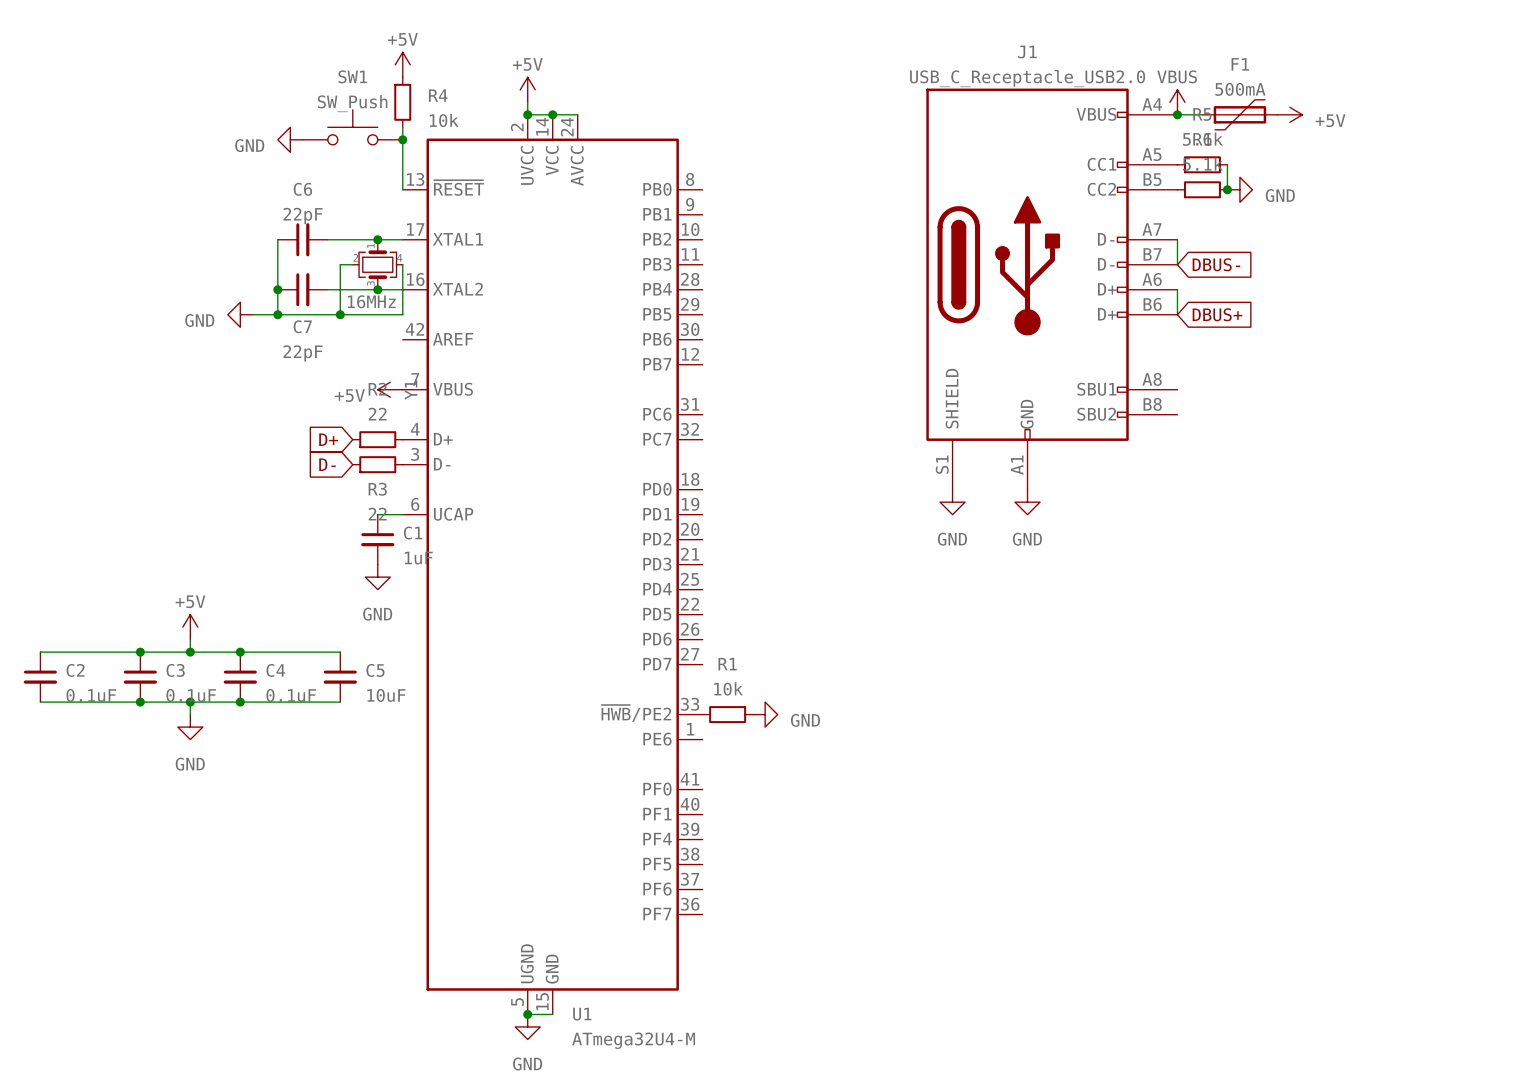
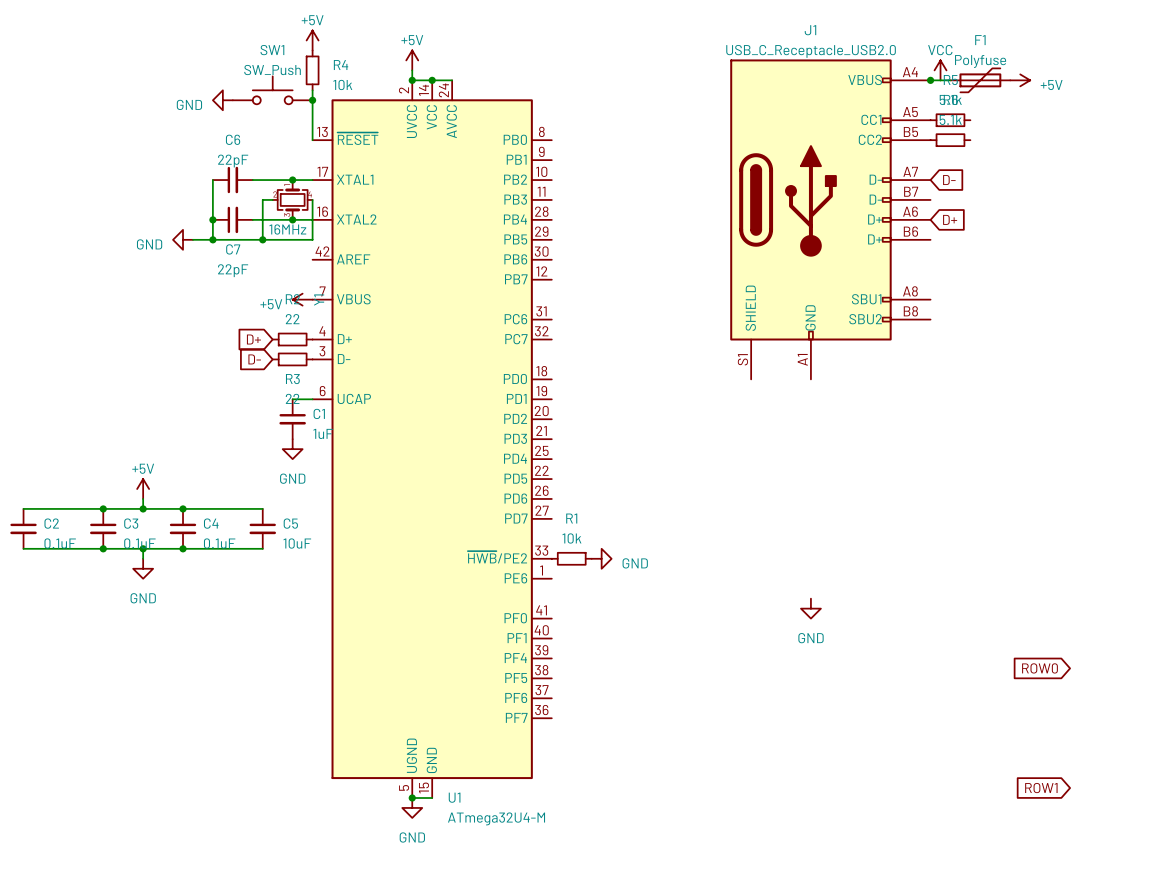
F1 value: 500mA (1240, 89) -> Polyfuse (980, 61)
power symbol: VBUS (1177, 102) -> none
power symbol: none -> VCC (940, 70)
wire: (1227, 164) (1227, 189) -> none
junction: (1227, 189) -> none
power symbol: GND (1239, 189) -> none
wire: (1177, 239) (1177, 264) -> none
global label: none -> D- (949, 180)
global label: DBUS- (1216, 264) -> none
wire: (1177, 289) (1177, 314) -> none
global label: none -> D+ (950, 219)
global label: DBUS+ (1217, 314) -> none
power symbol: GND (952, 502) -> none
power symbol: GND (1027, 502) -> none
power symbol: none -> GND (810, 608)
global label: none -> ROW0 (1039, 668)
global label: none -> ROW1 (1041, 788)

